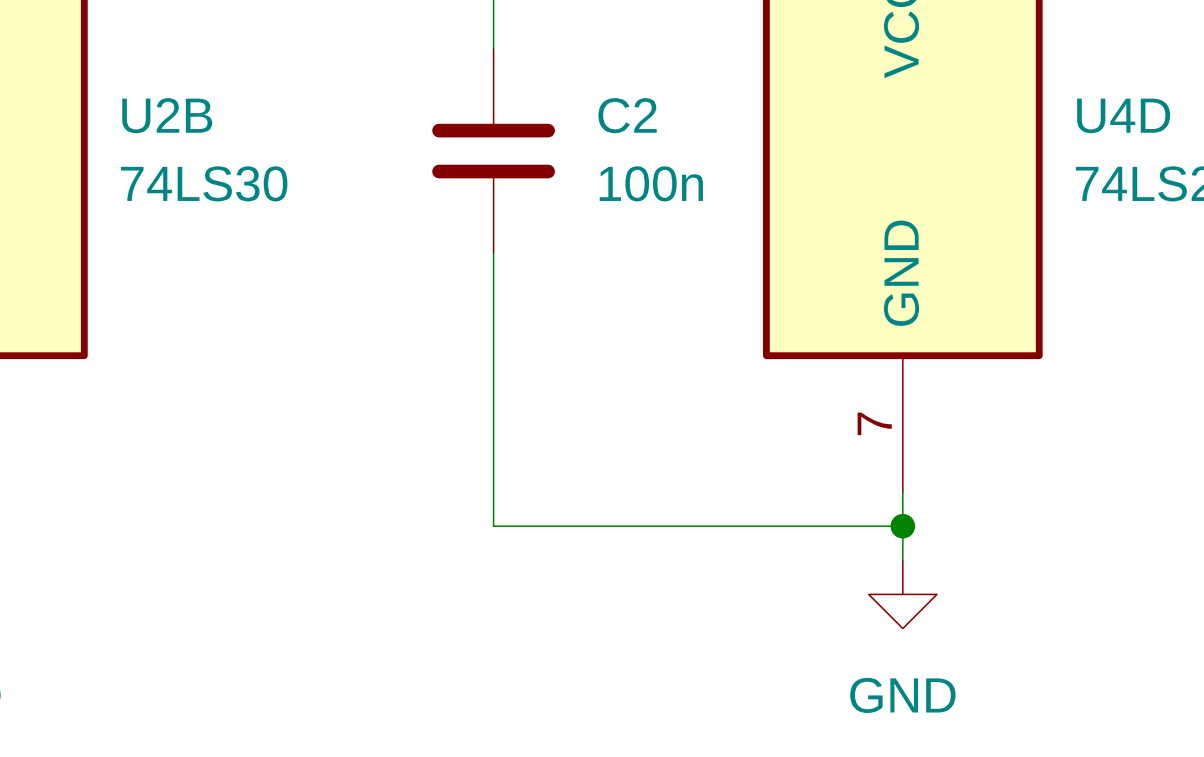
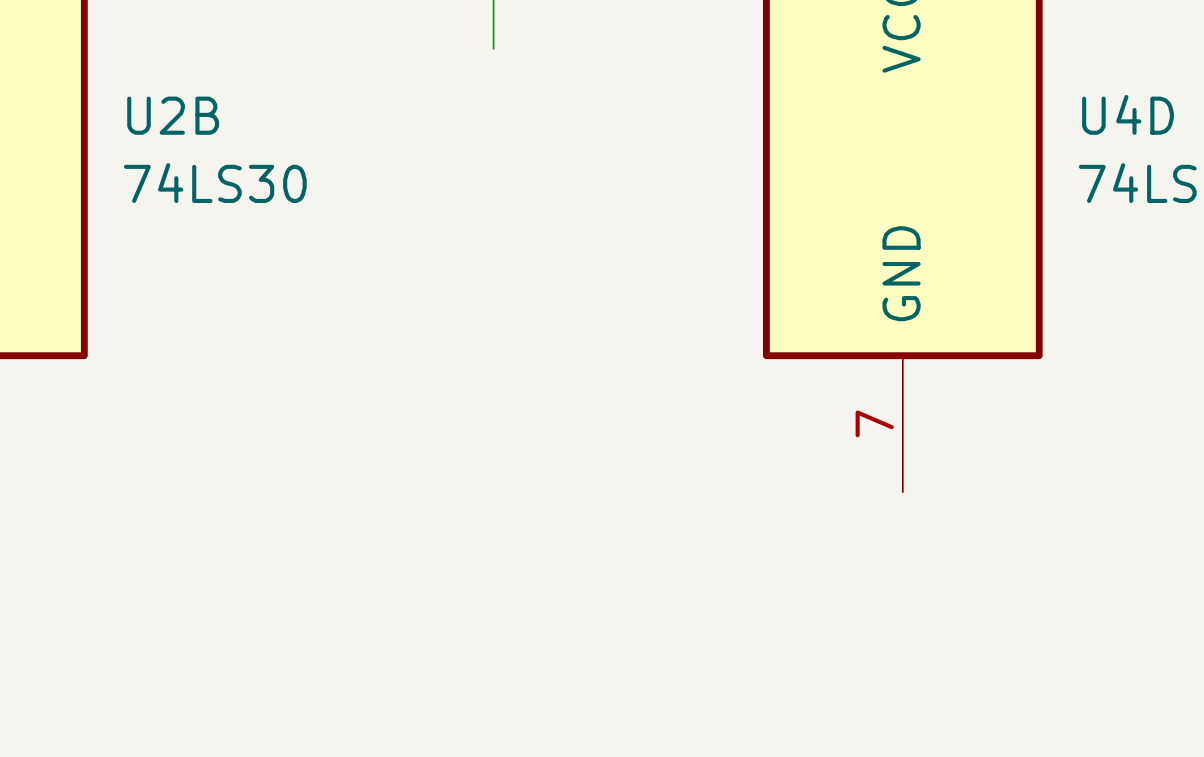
C2: 100n (493, 151) -> none
wire: (493, 253) (493, 526) (902, 526) -> none
wire: (902, 492) (902, 560) -> none
junction: (902, 526) -> none
power symbol: GND (902, 594) -> none

